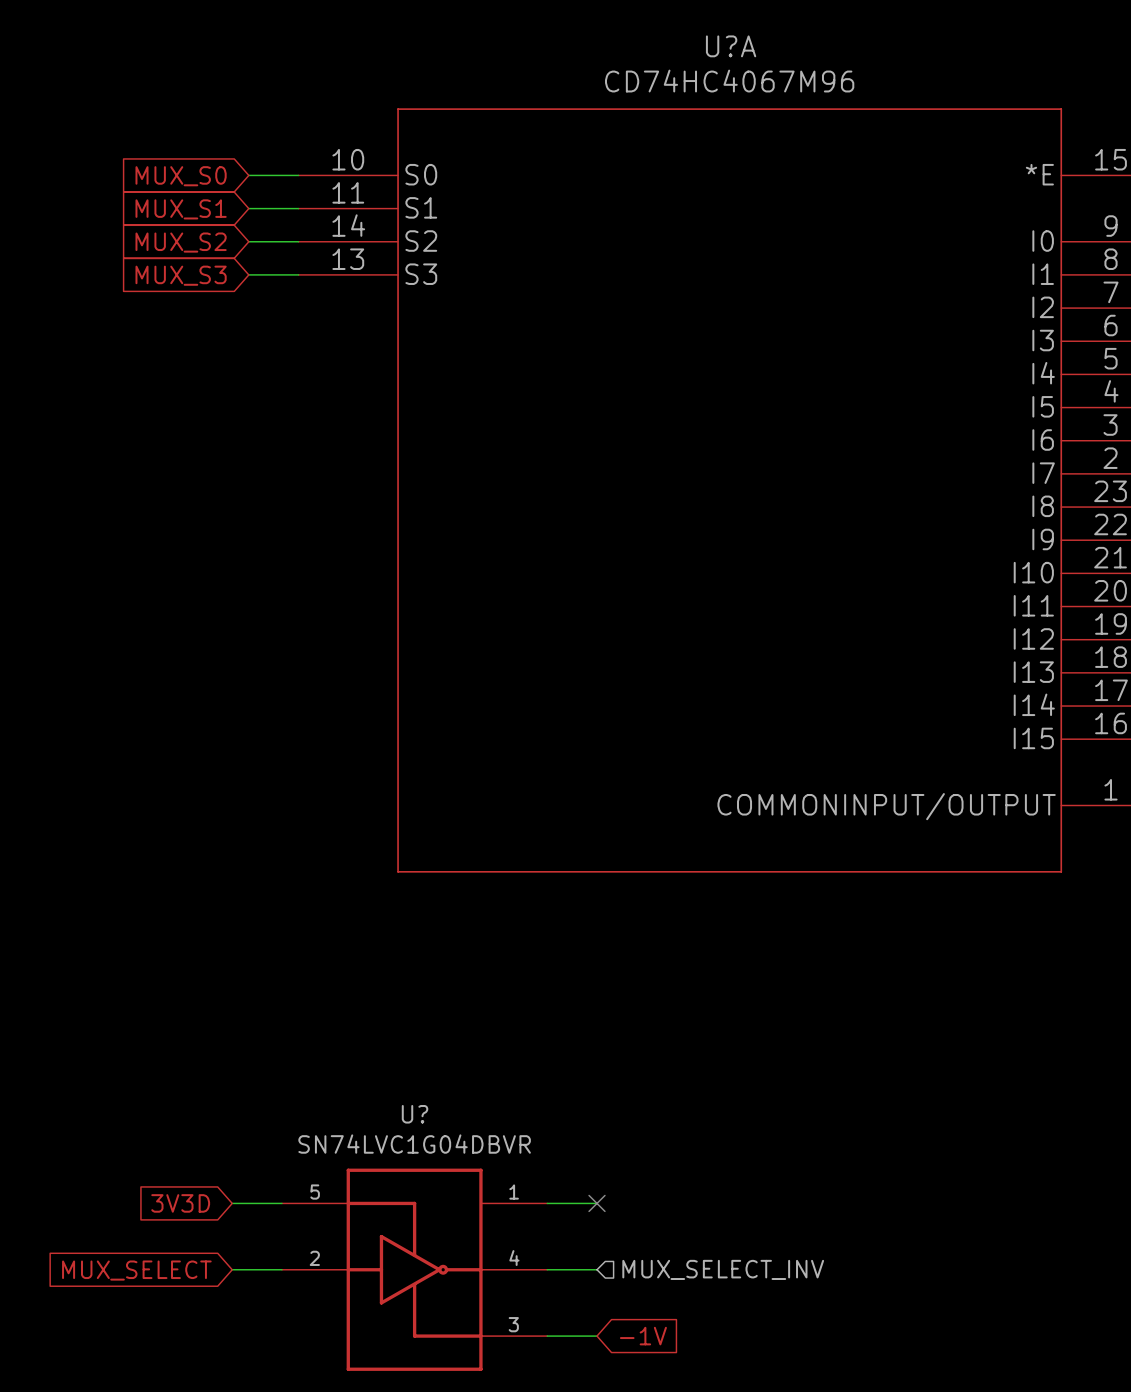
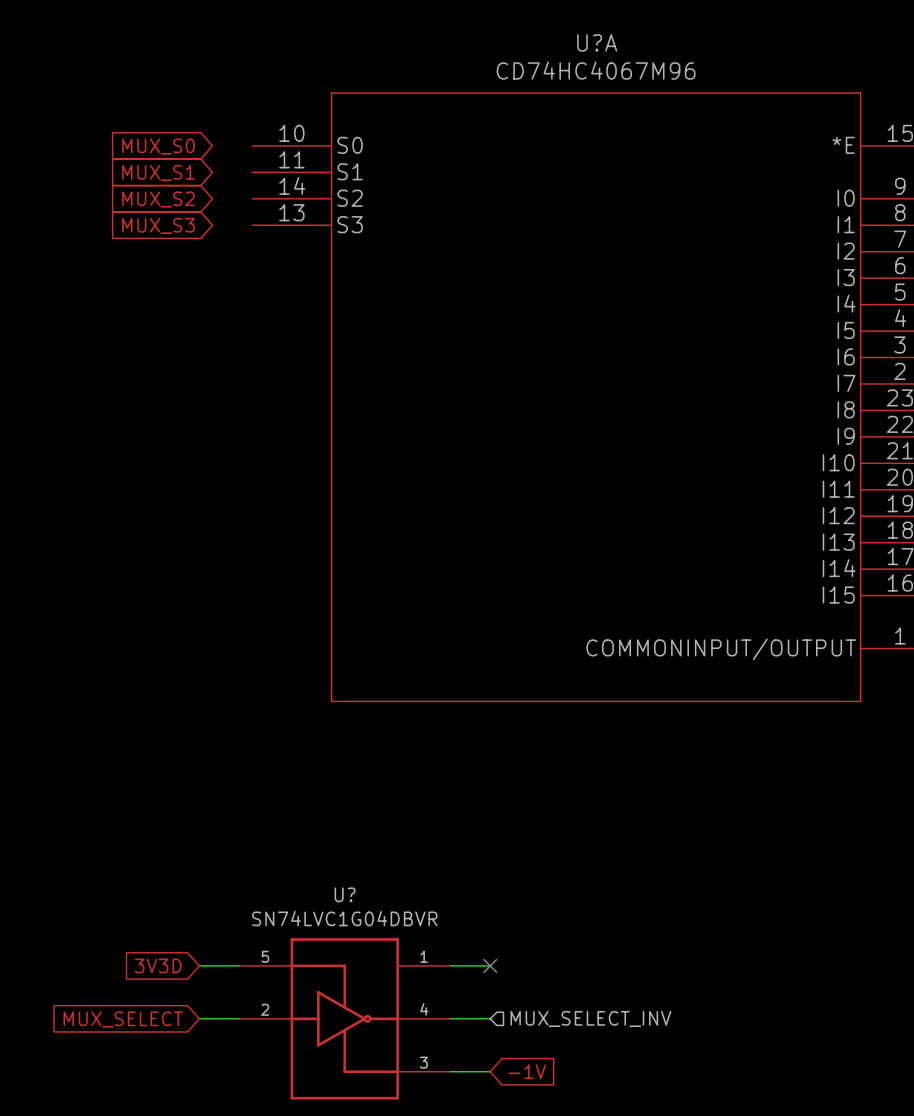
wire: (248, 175) (298, 175) -> none
wire: (248, 208) (298, 208) -> none
wire: (248, 241) (298, 241) -> none
wire: (248, 274) (298, 274) -> none

